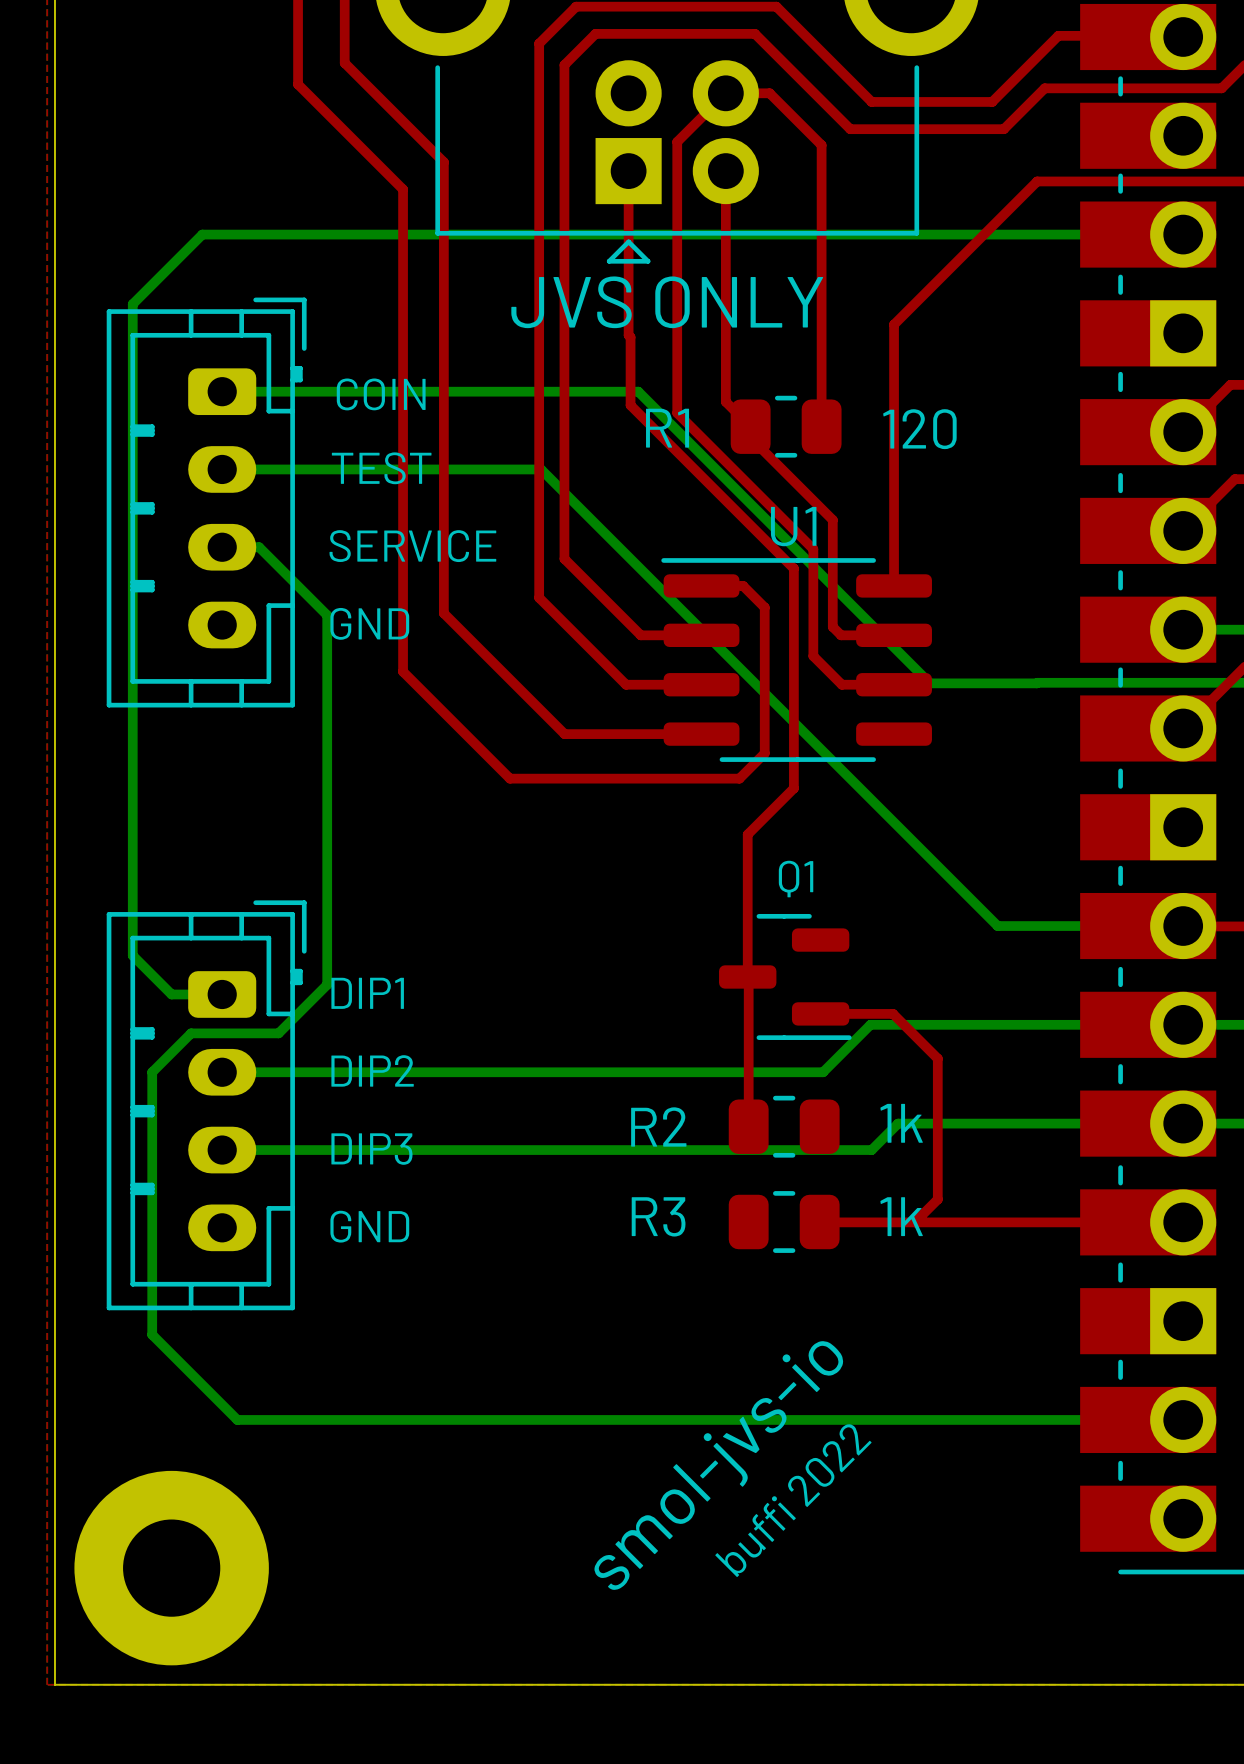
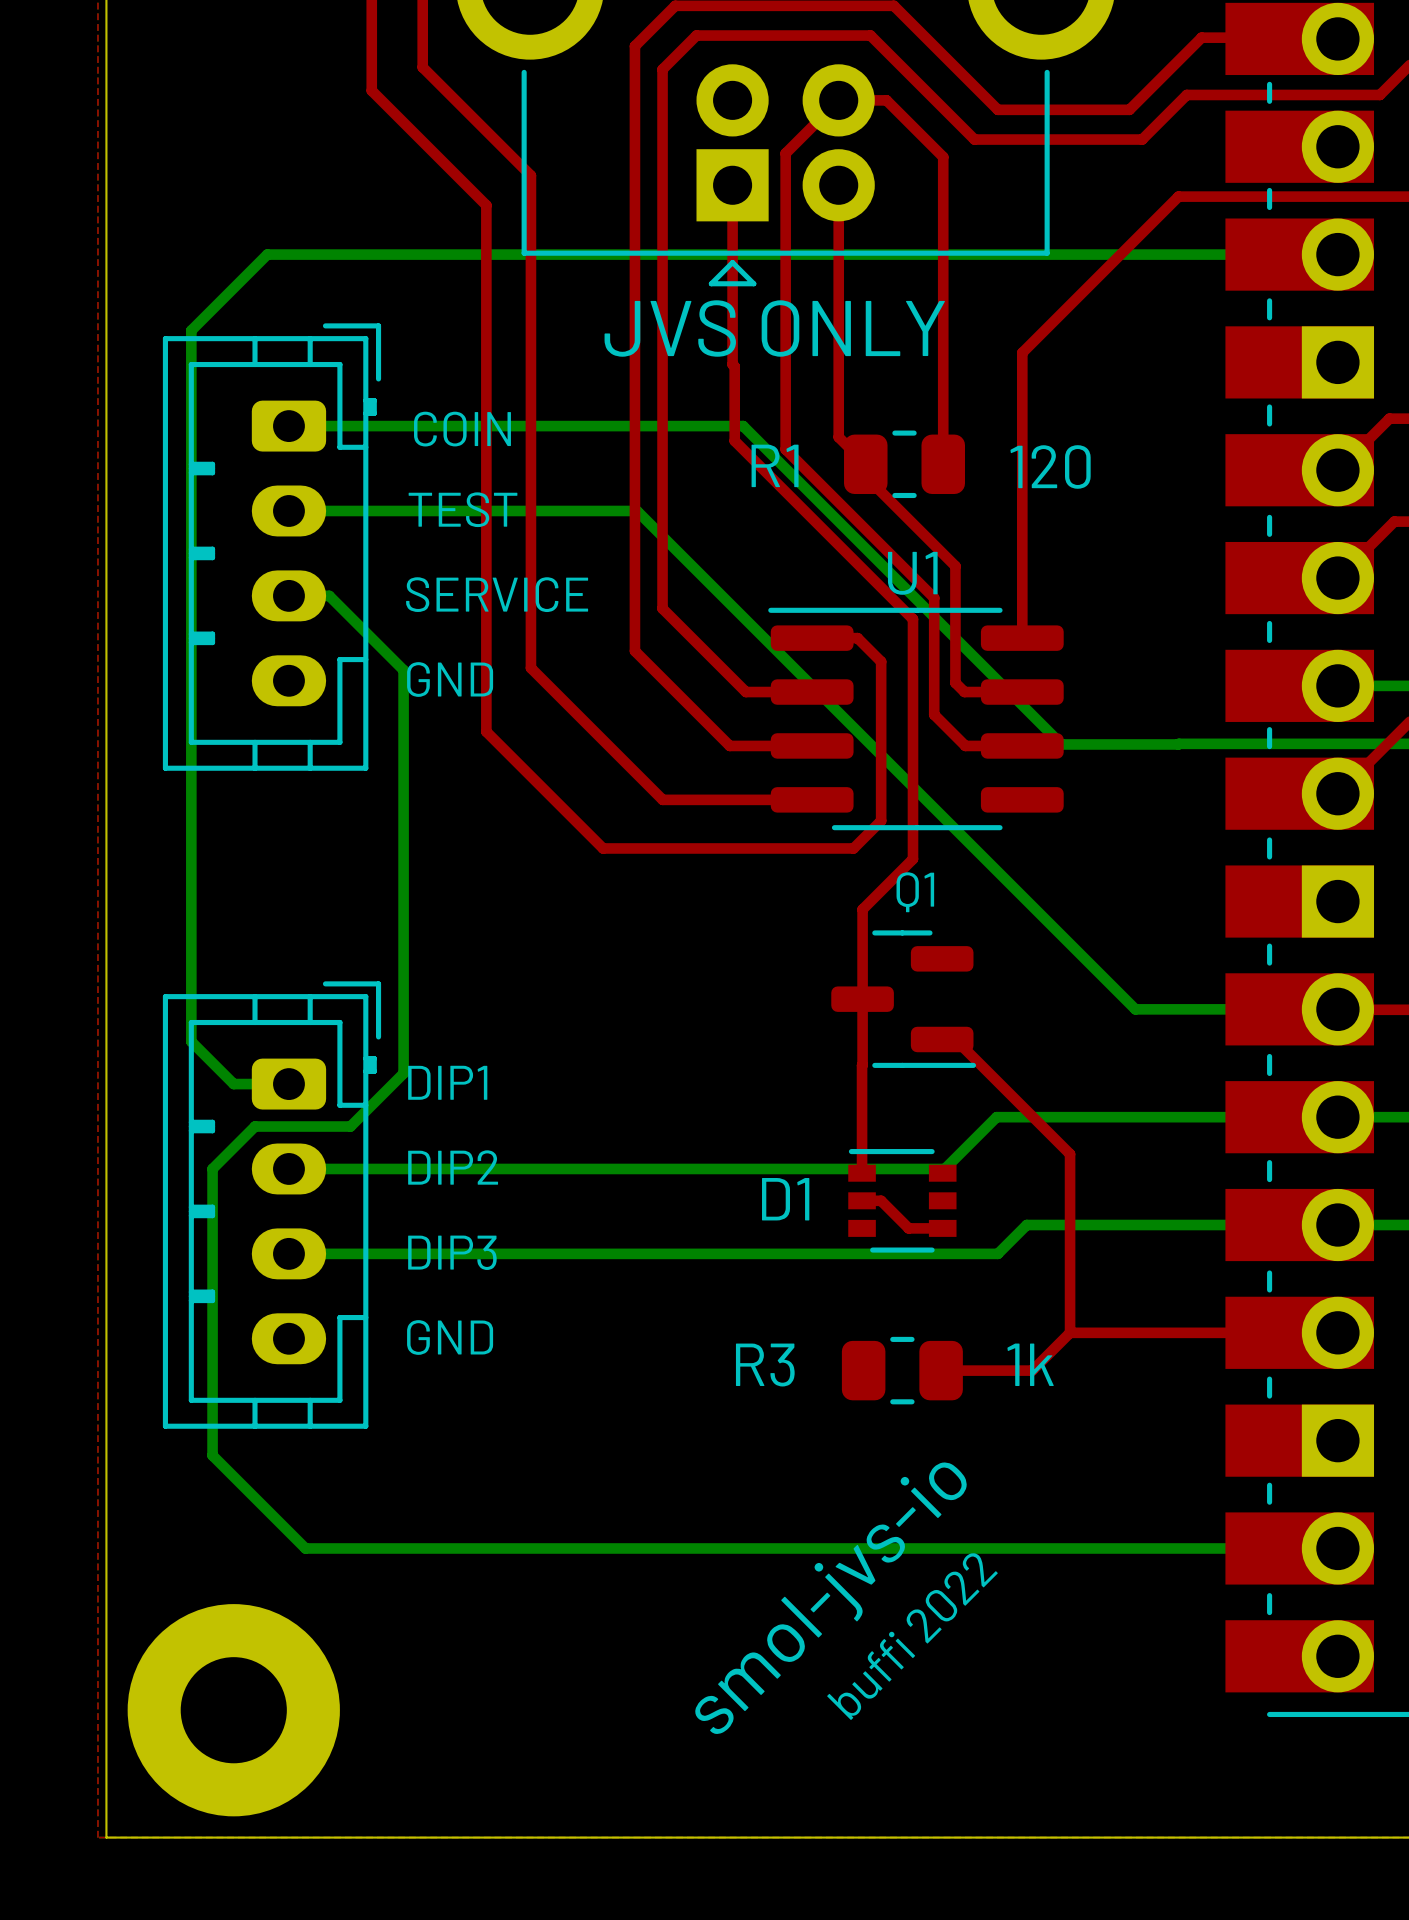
top track: (747, 976) (748, 1126) -> (862, 1065) (862, 1173)
Q1 position: (785, 976) -> (903, 999)
top track: (820, 1013) (893, 1013) -> (942, 1039) (955, 1039) (1021, 1105)
top track: none -> (862, 1200) (881, 1200) (908, 1228) (942, 1228)
D1: none -> (902, 1200)
R2: 1k (784, 1126) -> none
top track: (937, 1199) (914, 1222) -> (1070, 1307) (1070, 1332) (1032, 1370) (941, 1370)
R3 position: (784, 1221) -> (902, 1370)
top track: (820, 1222) (937, 1222) -> none

